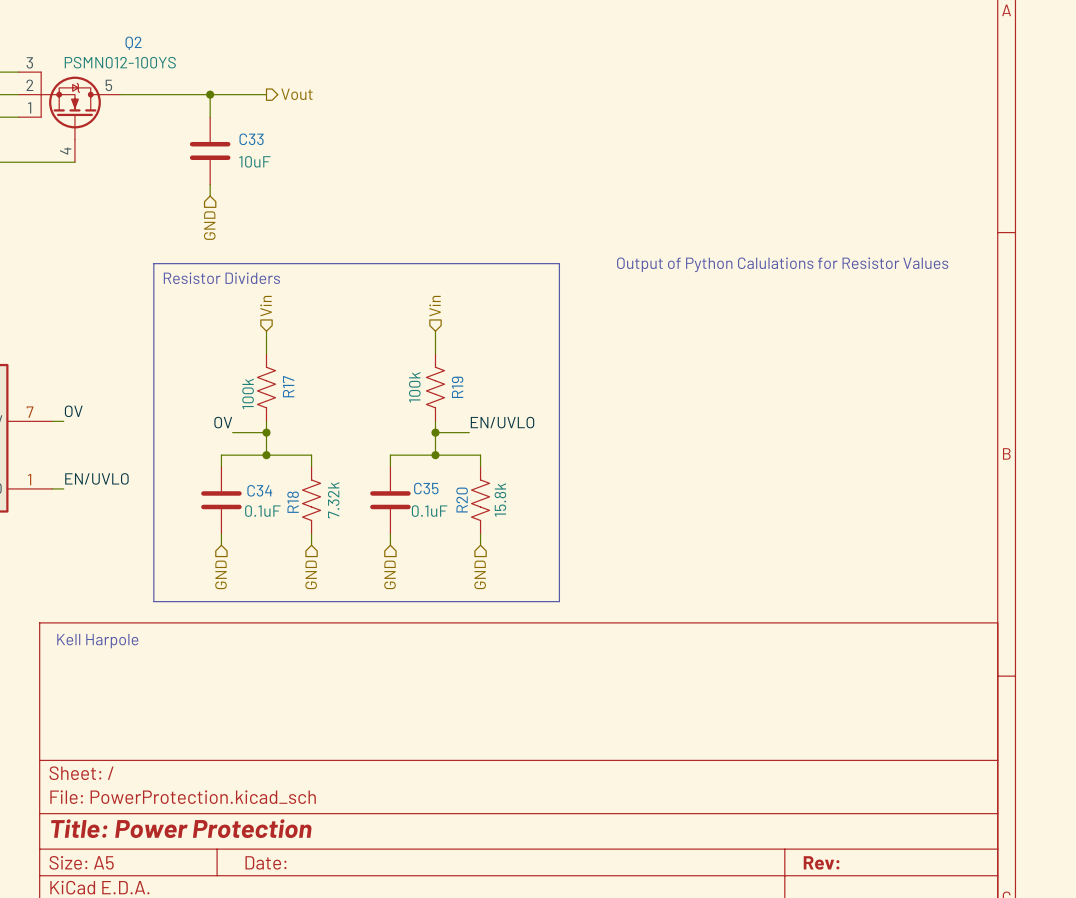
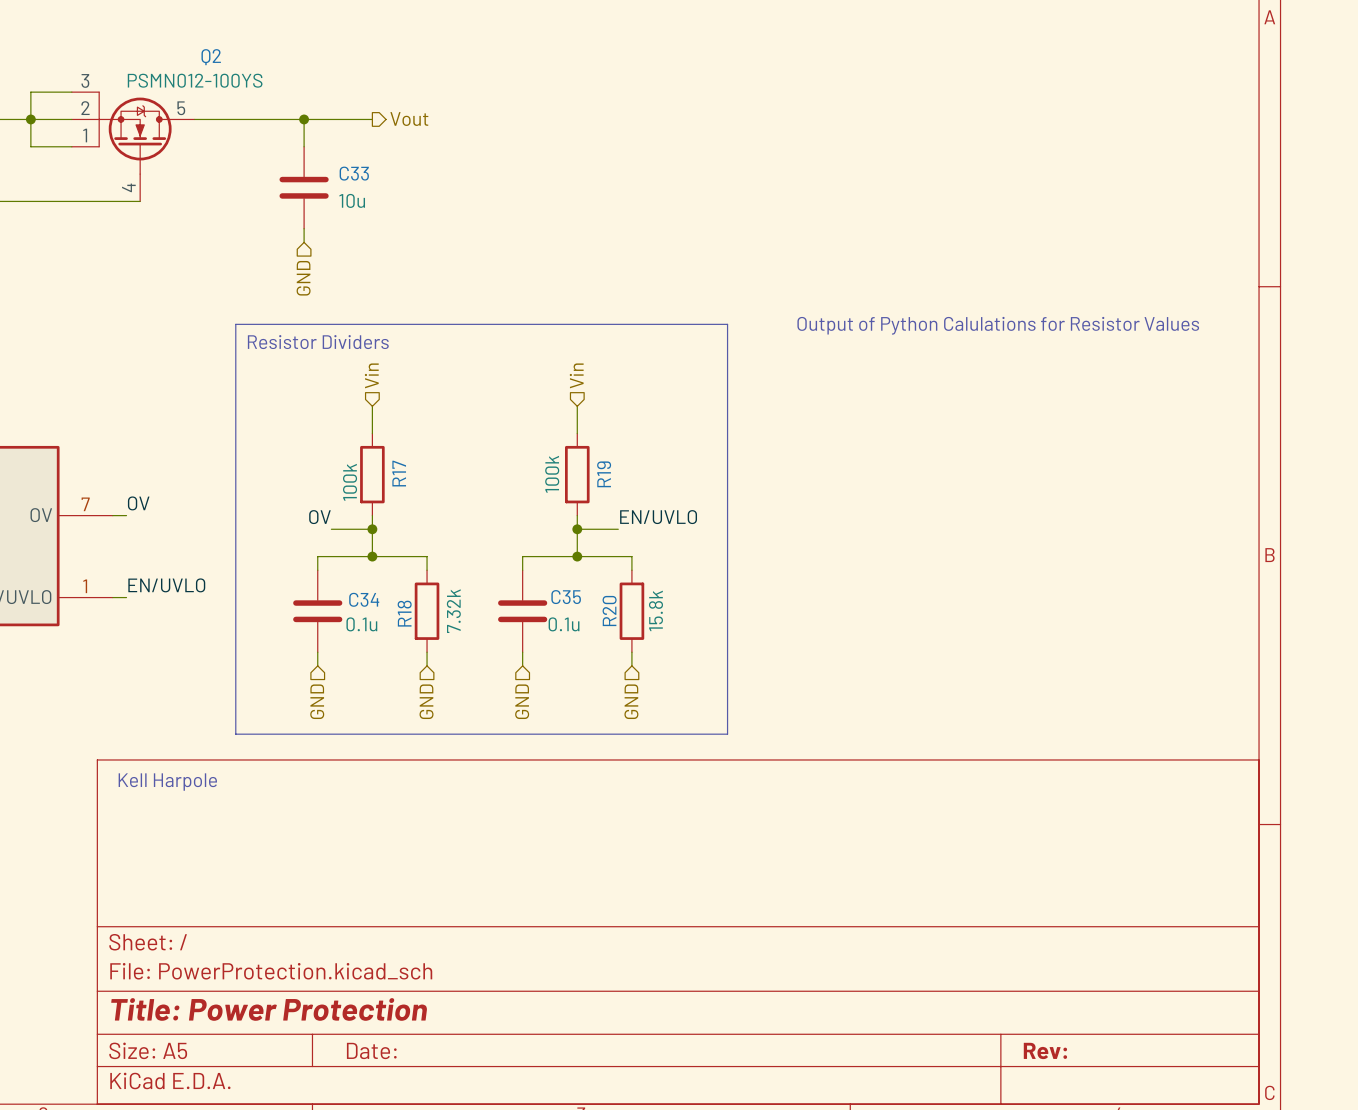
C33 value: 10uF (254, 161) -> 10u (352, 200)
R17 symbol: [257, 353, 276, 422] -> [360, 433, 385, 516]
R19 symbol: [426, 353, 445, 422] -> [565, 433, 590, 516]
R18 symbol: [302, 466, 321, 535] -> [414, 570, 440, 653]
R20 symbol: [471, 466, 490, 535] -> [619, 570, 645, 653]
C34 value: 0.1uF (262, 511) -> 0.1u (361, 624)
C35 value: 0.1uF (429, 511) -> 0.1u (564, 624)

